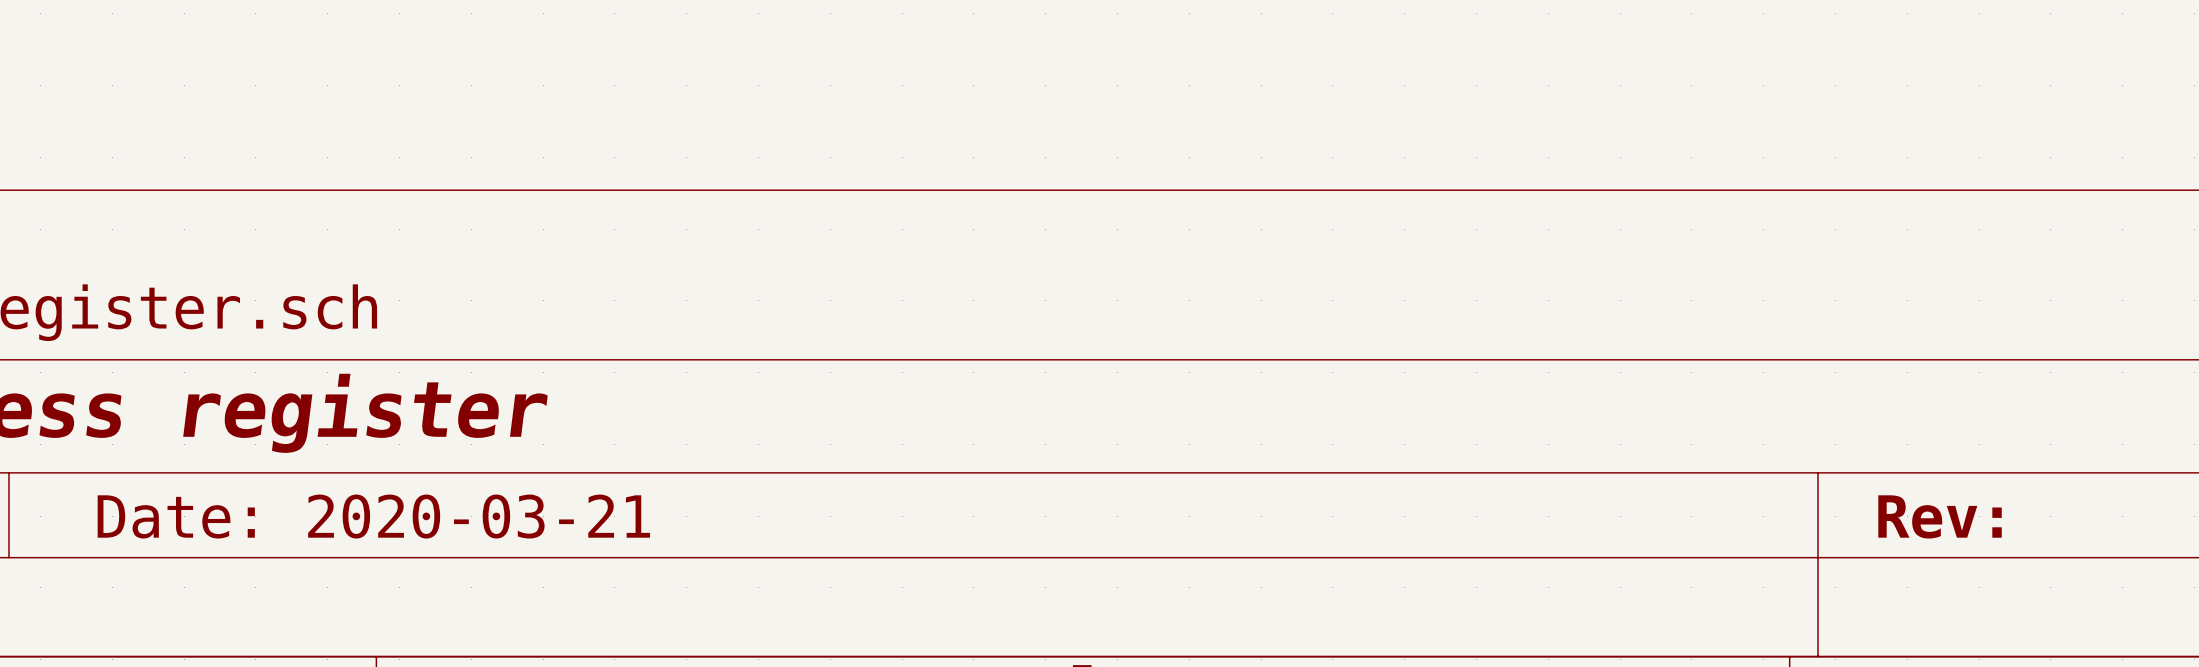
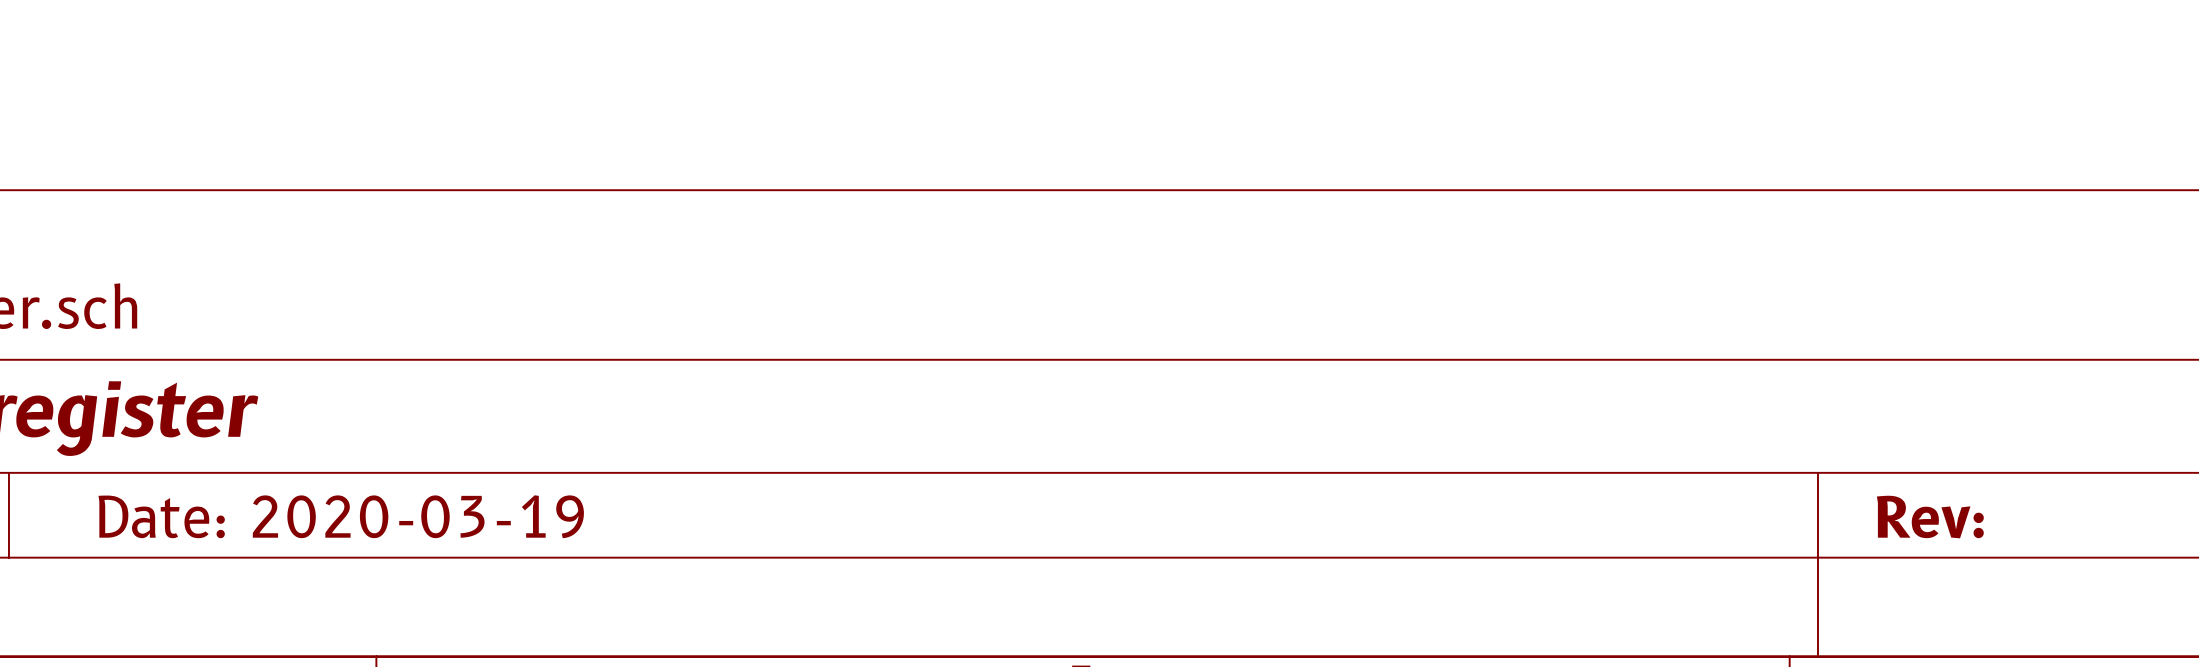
title block: Date: 2020-03-21 (373, 516) -> Date: 2020-03-19 (341, 516)

